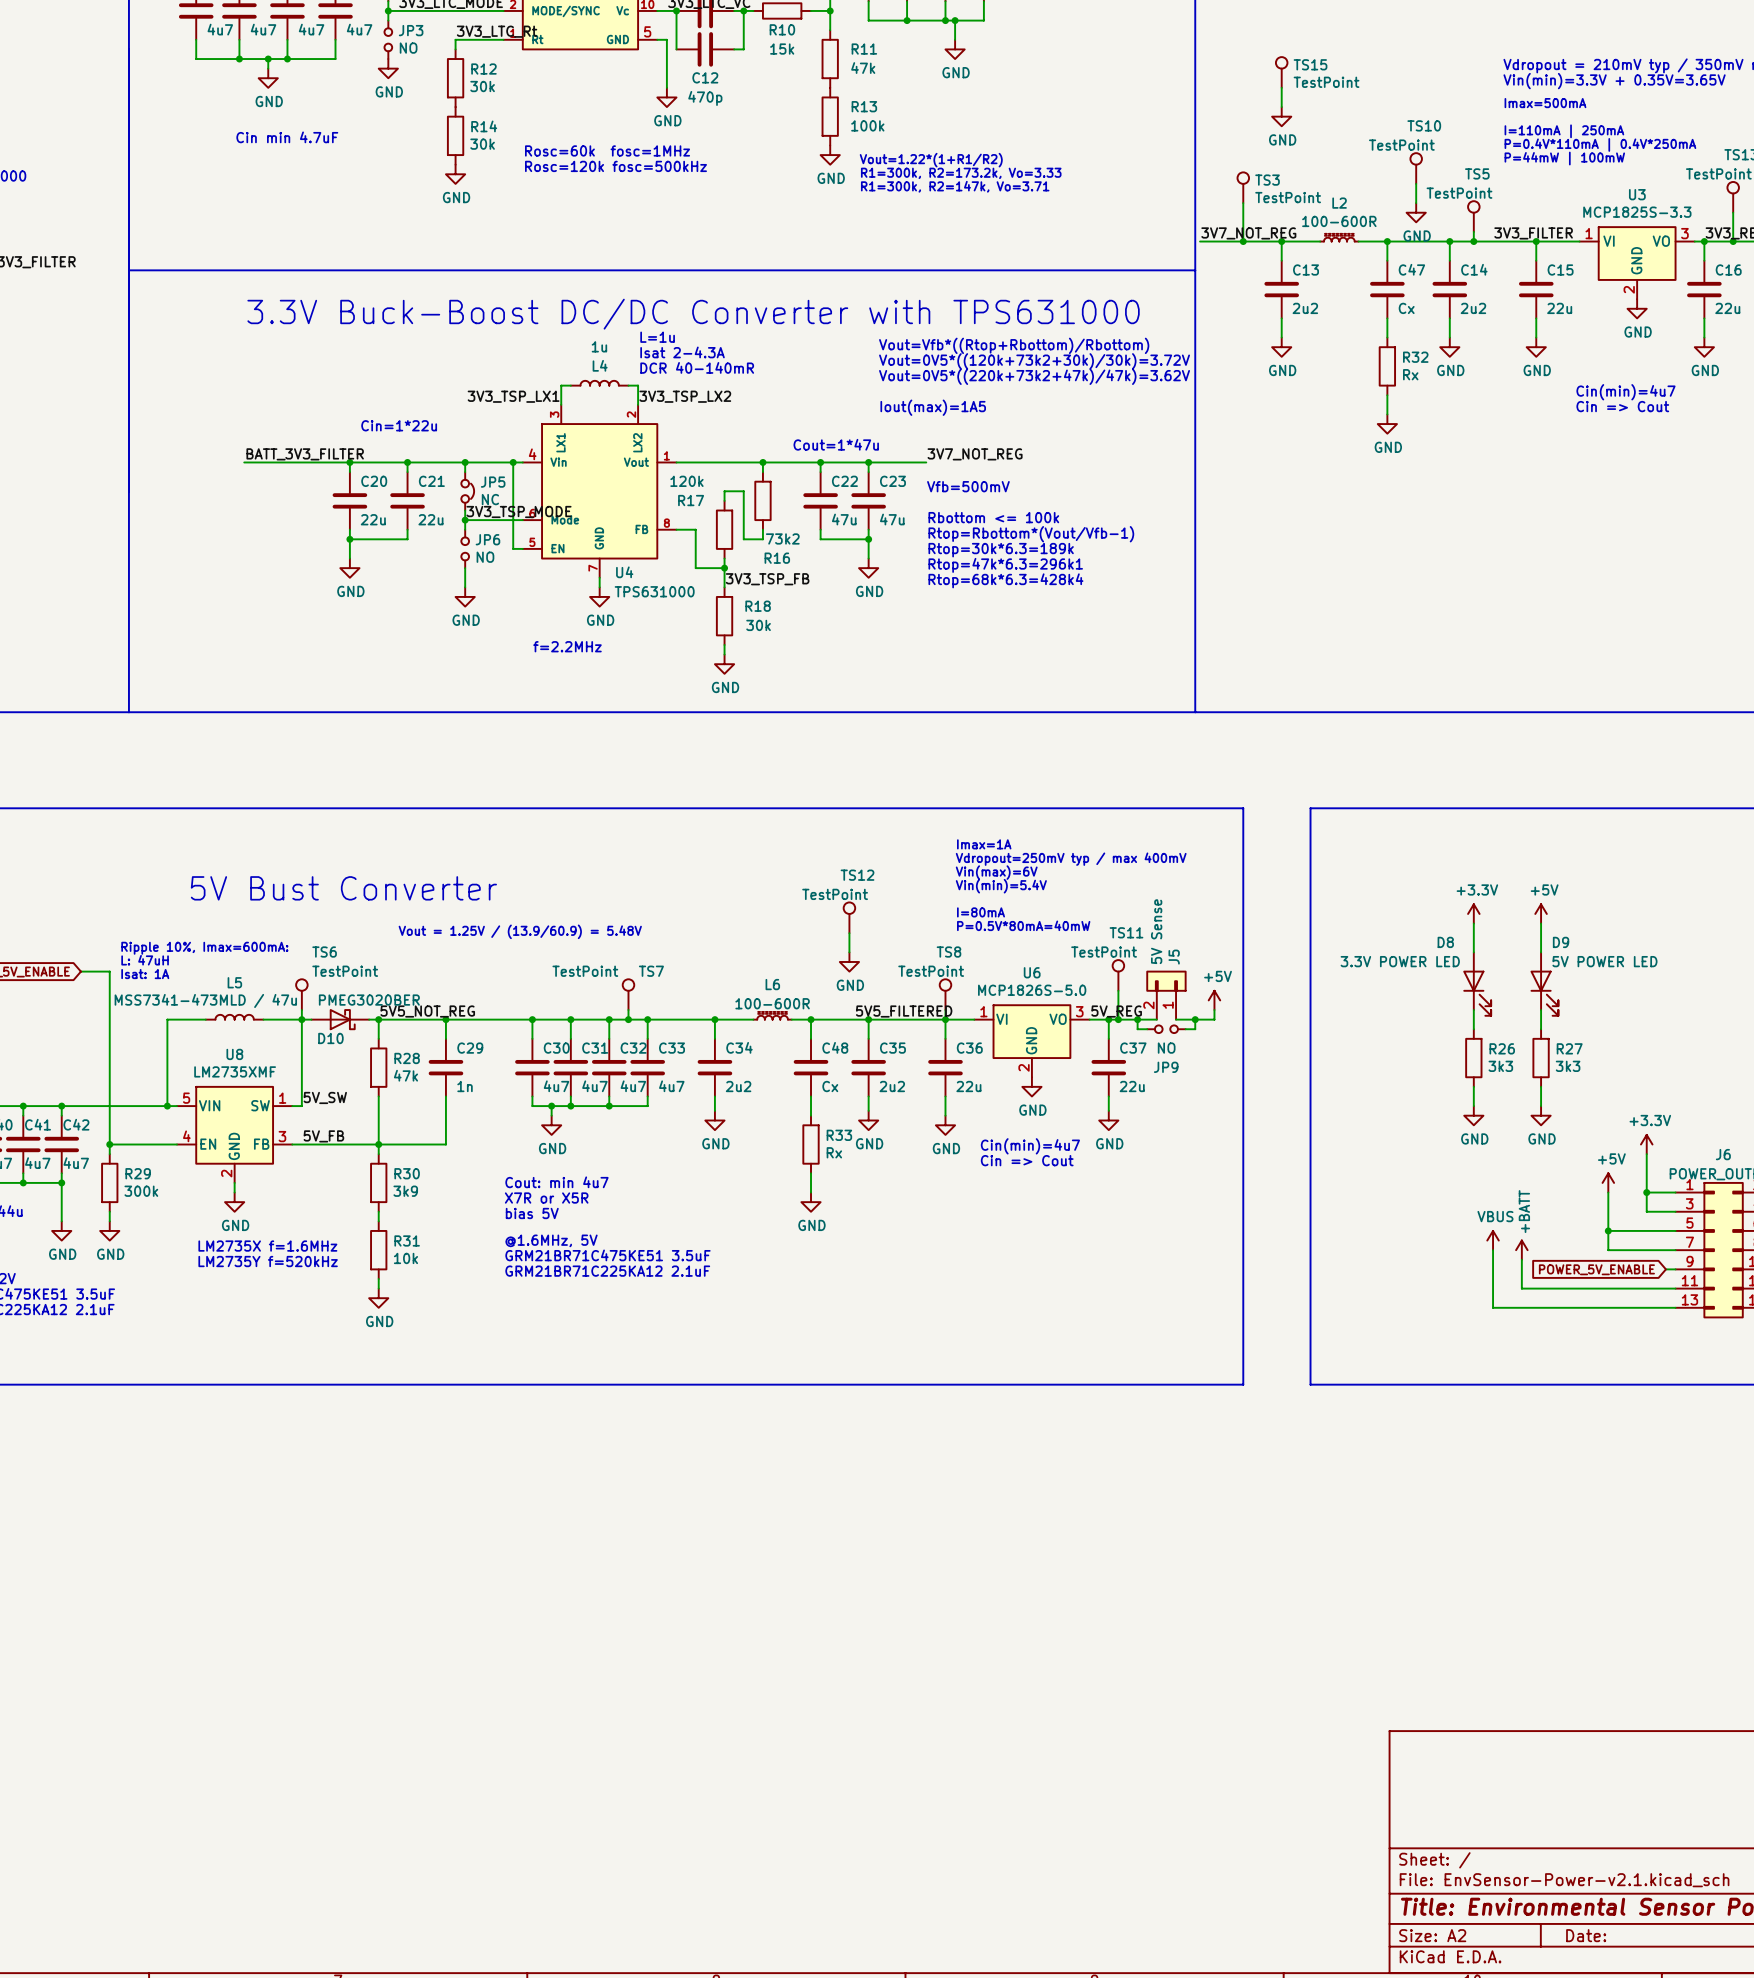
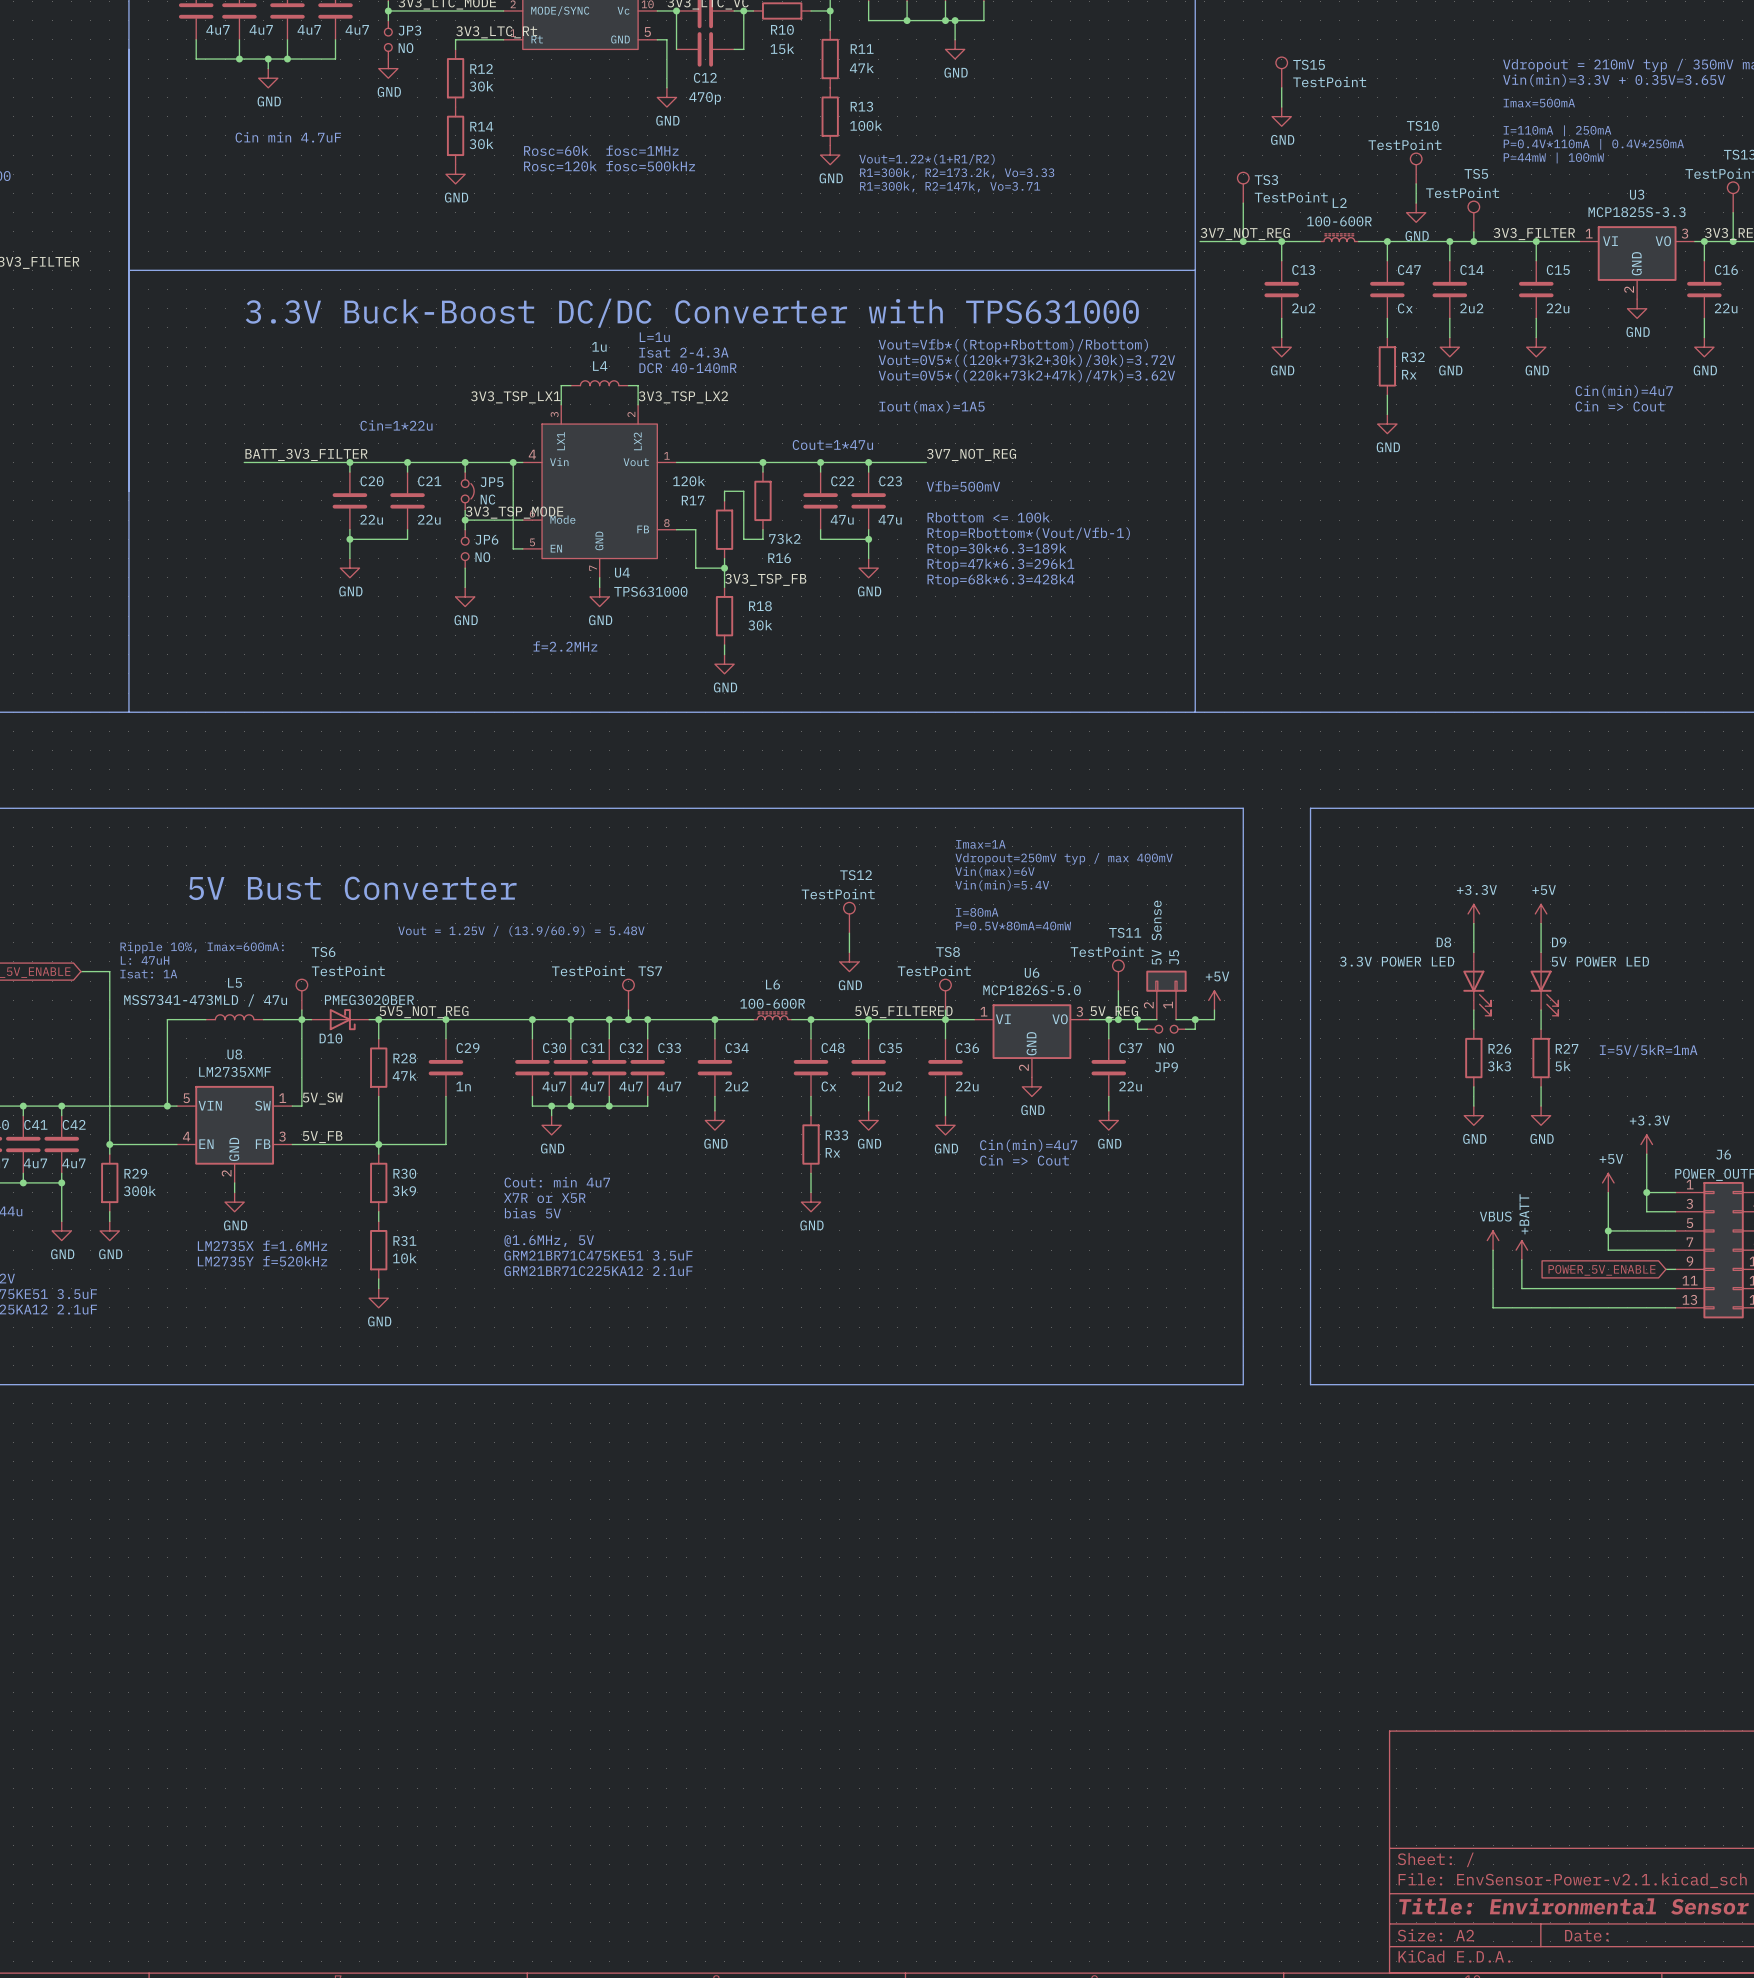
text: none -> I=5V/5kR=1mA (1648, 1050)
R27 value: 3k3 (1568, 1066) -> 5k (1563, 1066)

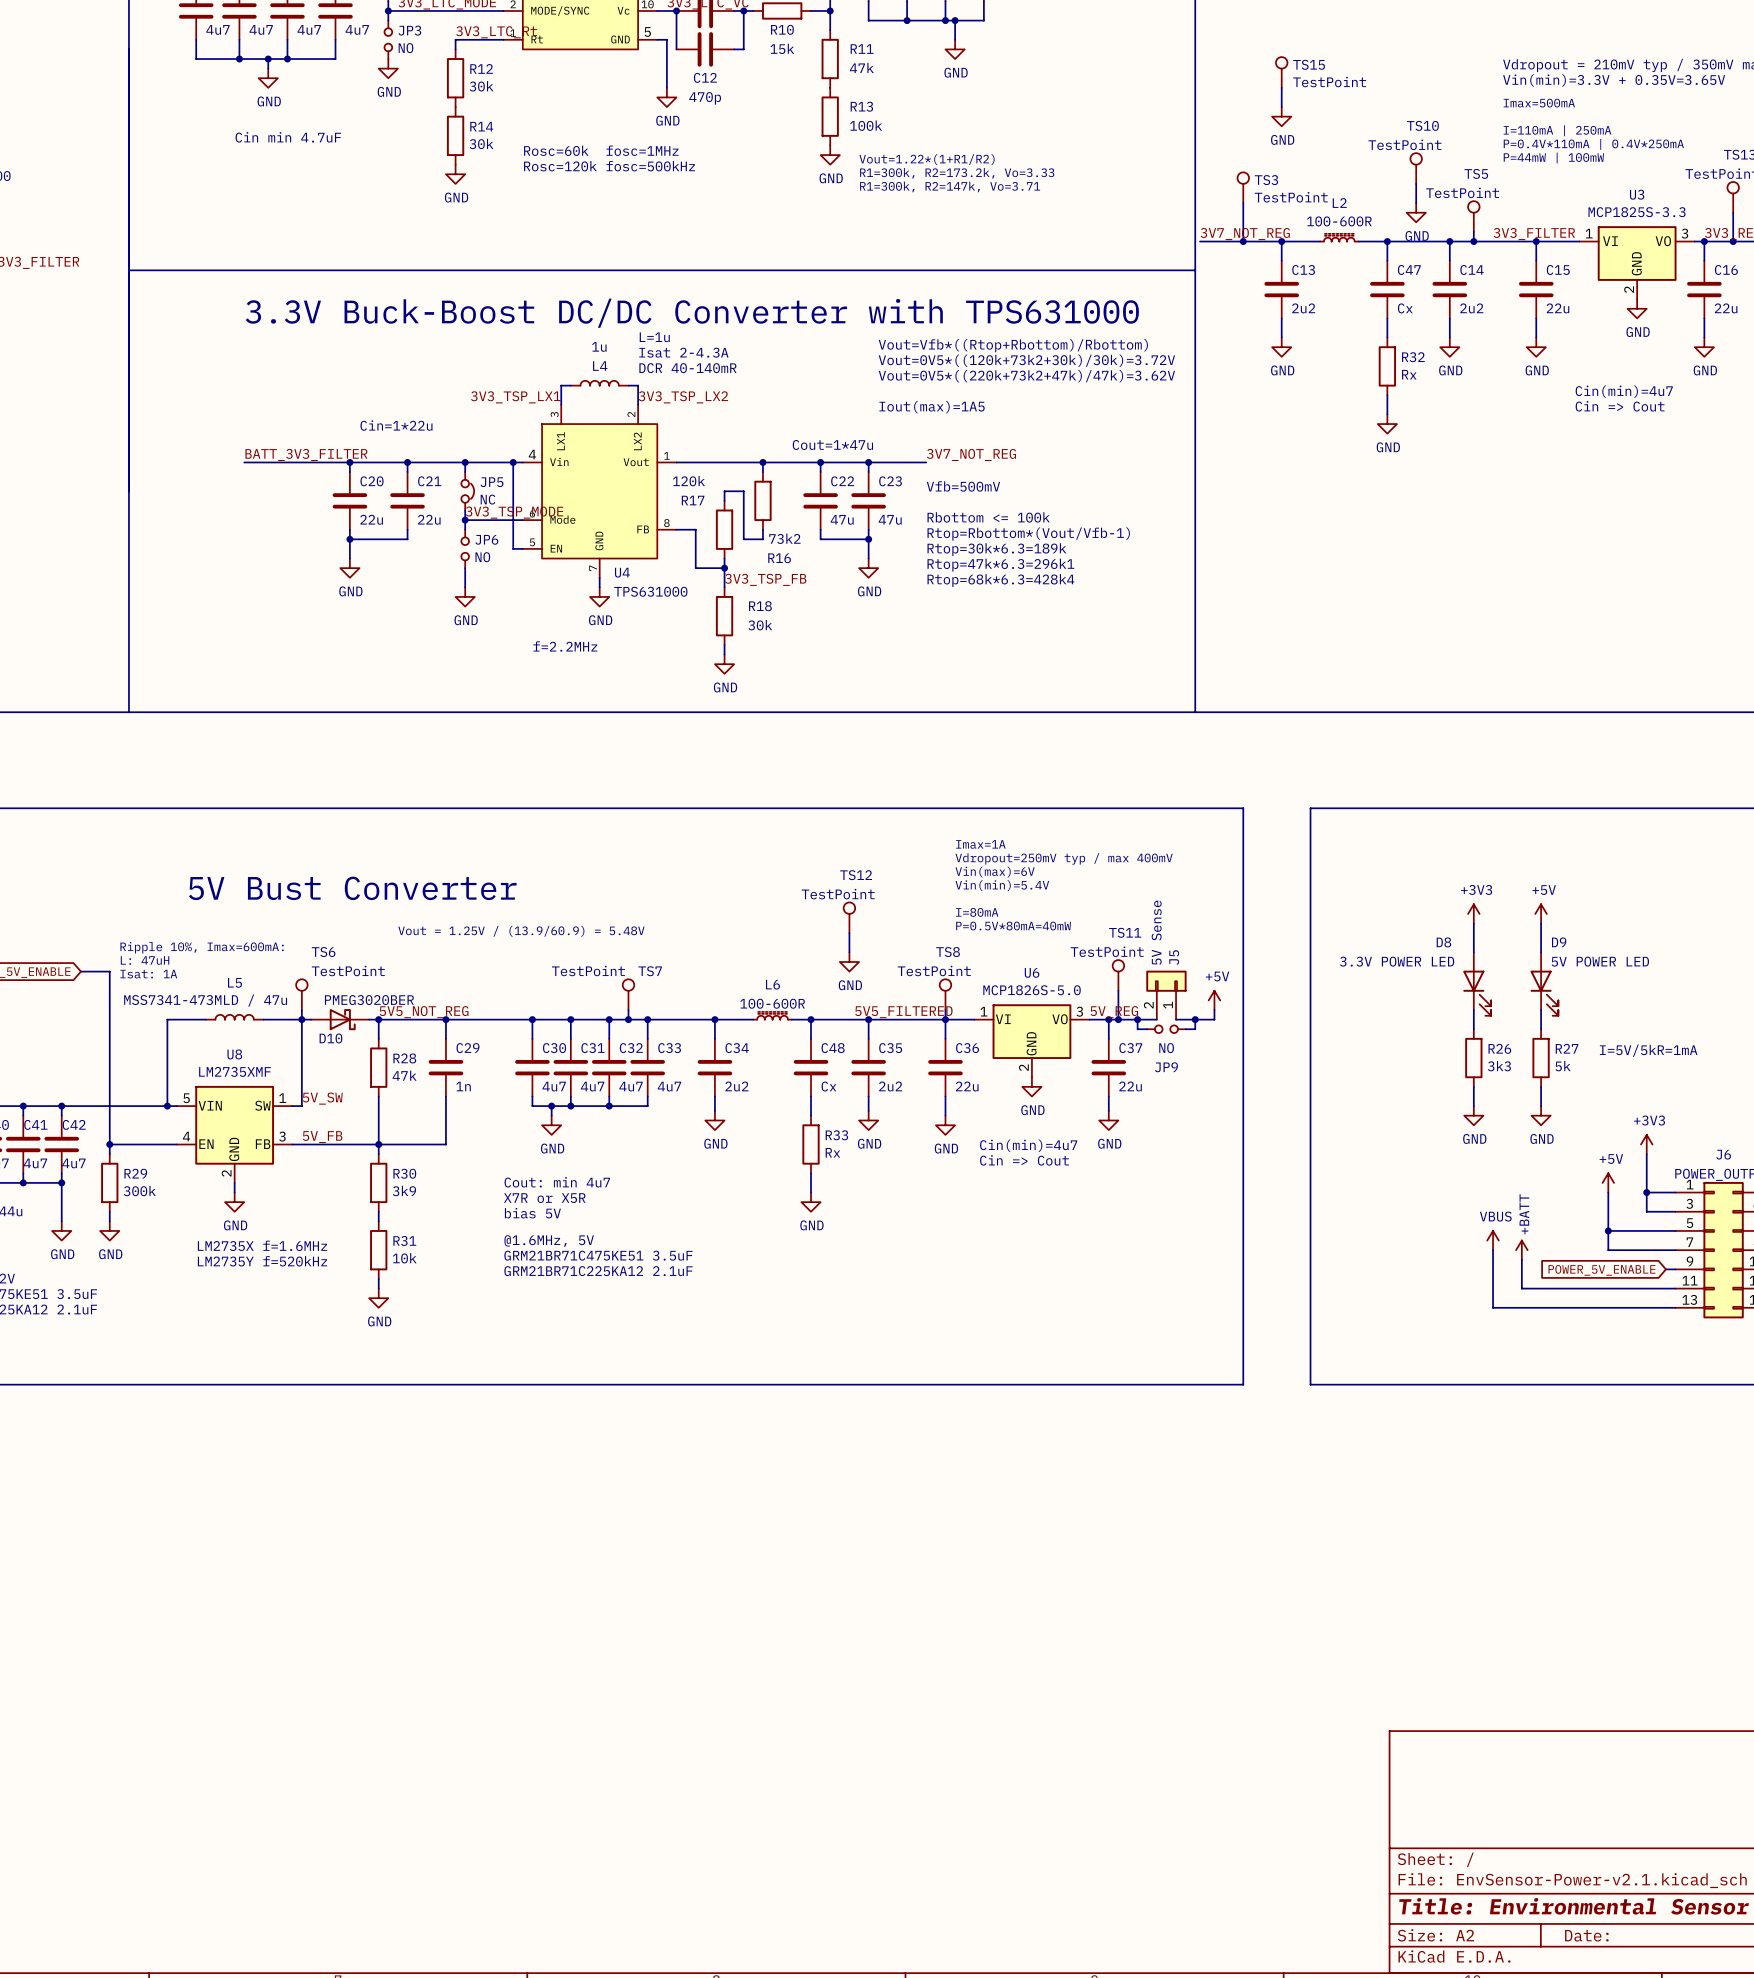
power symbol: +3.3V (1473, 913) -> +3V3 (1473, 913)
power symbol: +3.3V (1646, 1144) -> +3V3 (1646, 1144)

